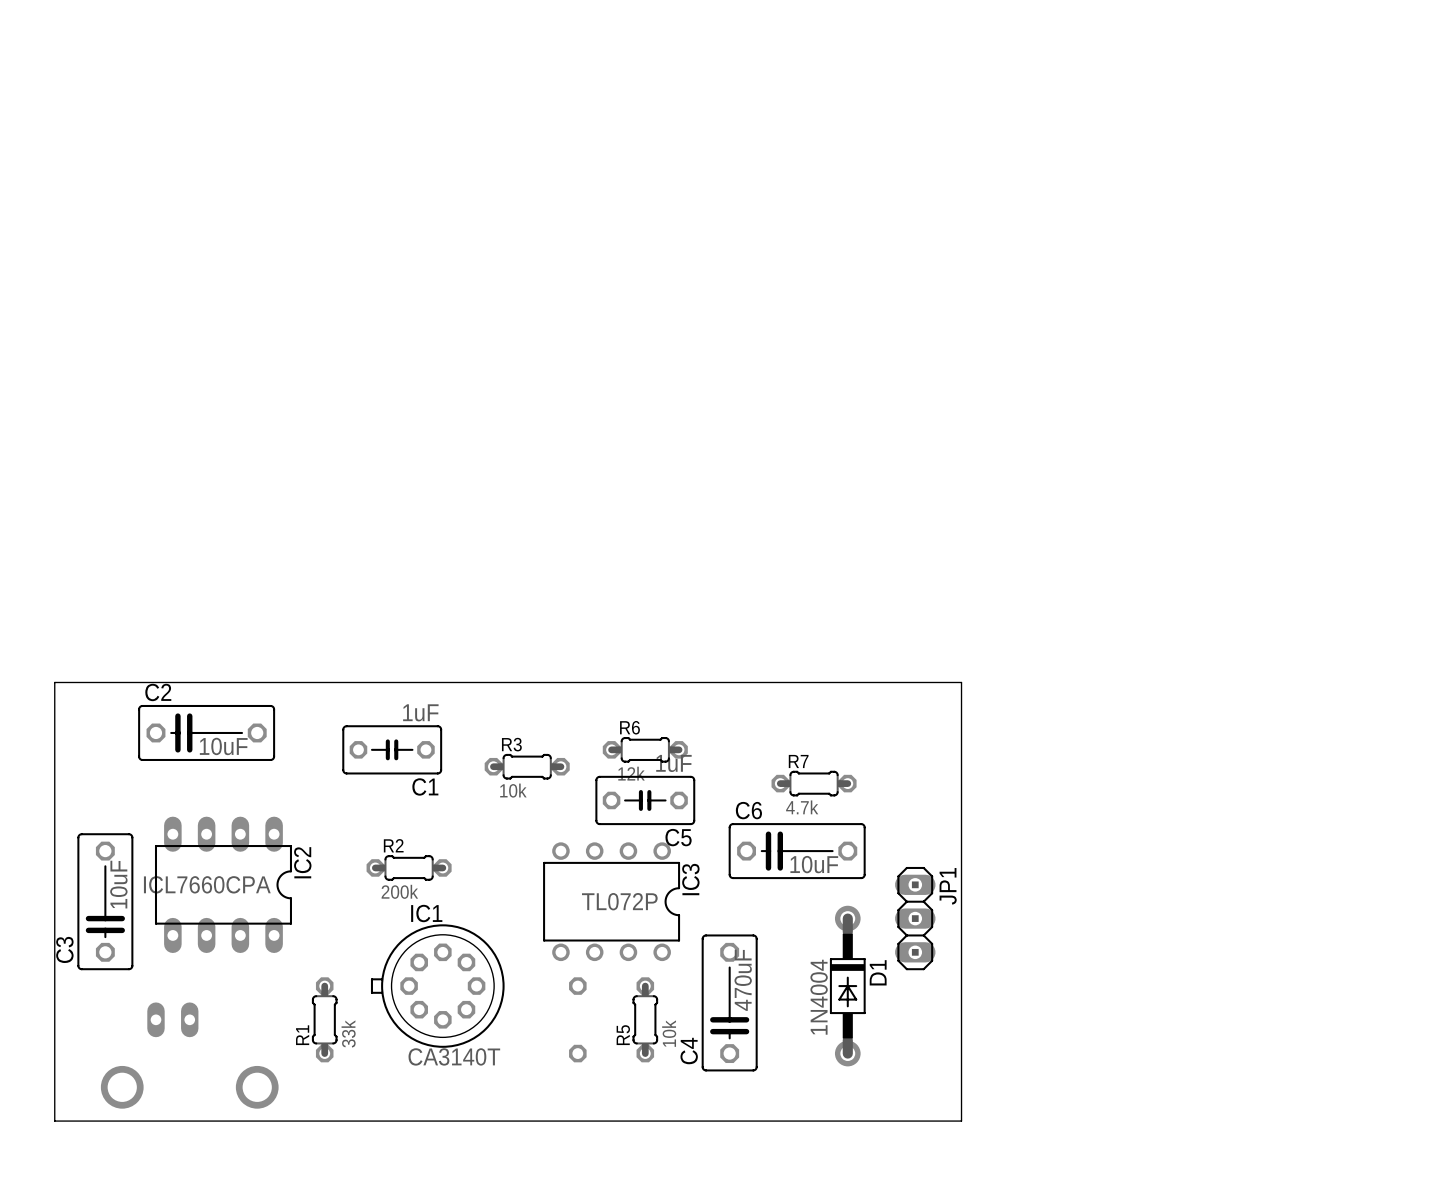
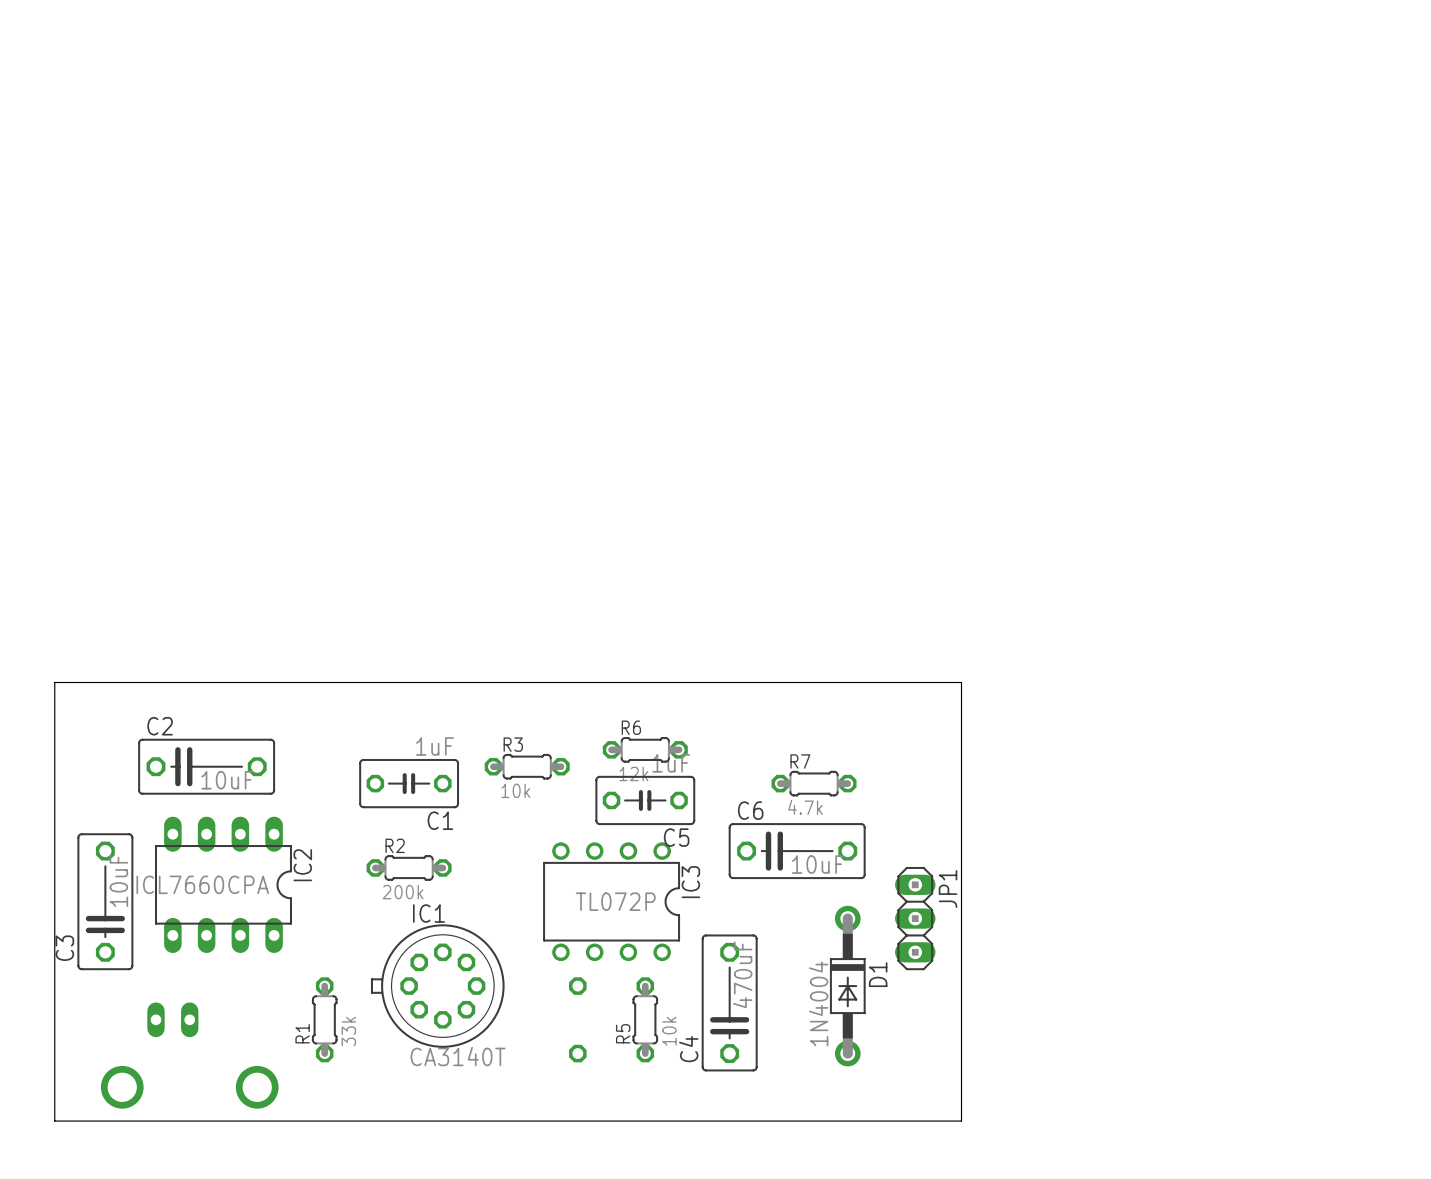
C2 position: (206, 732) -> (206, 766)
C1 position: (392, 749) -> (409, 783)

